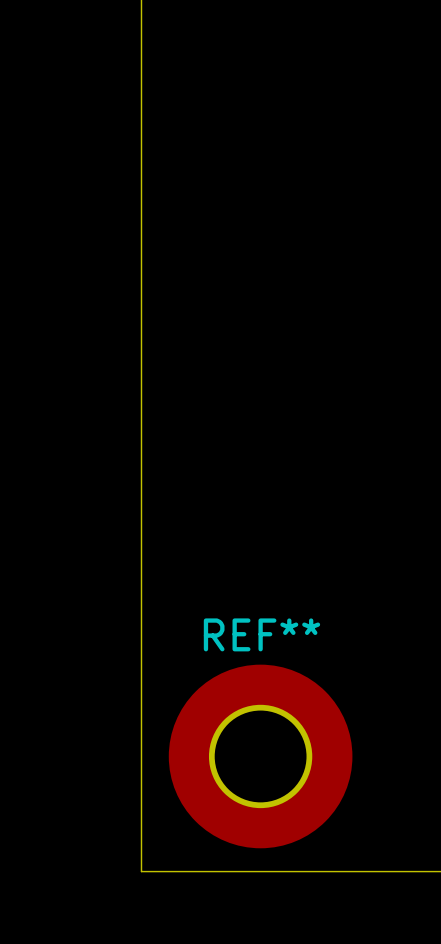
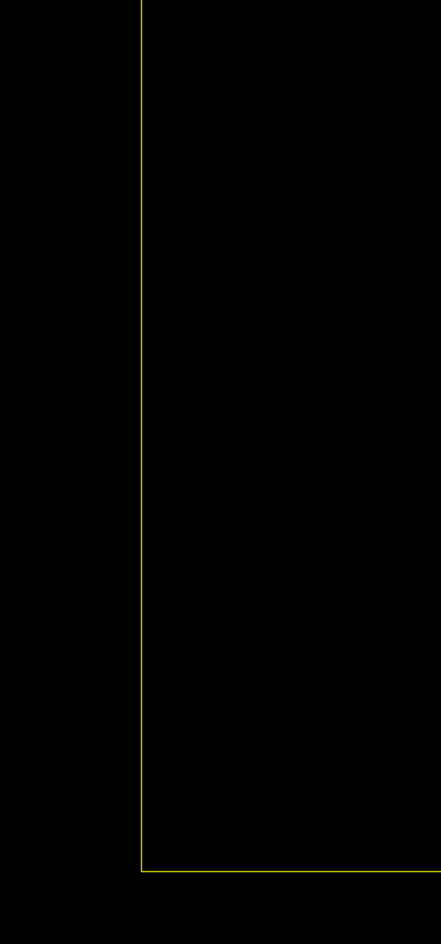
REF**: (260, 756) -> none

